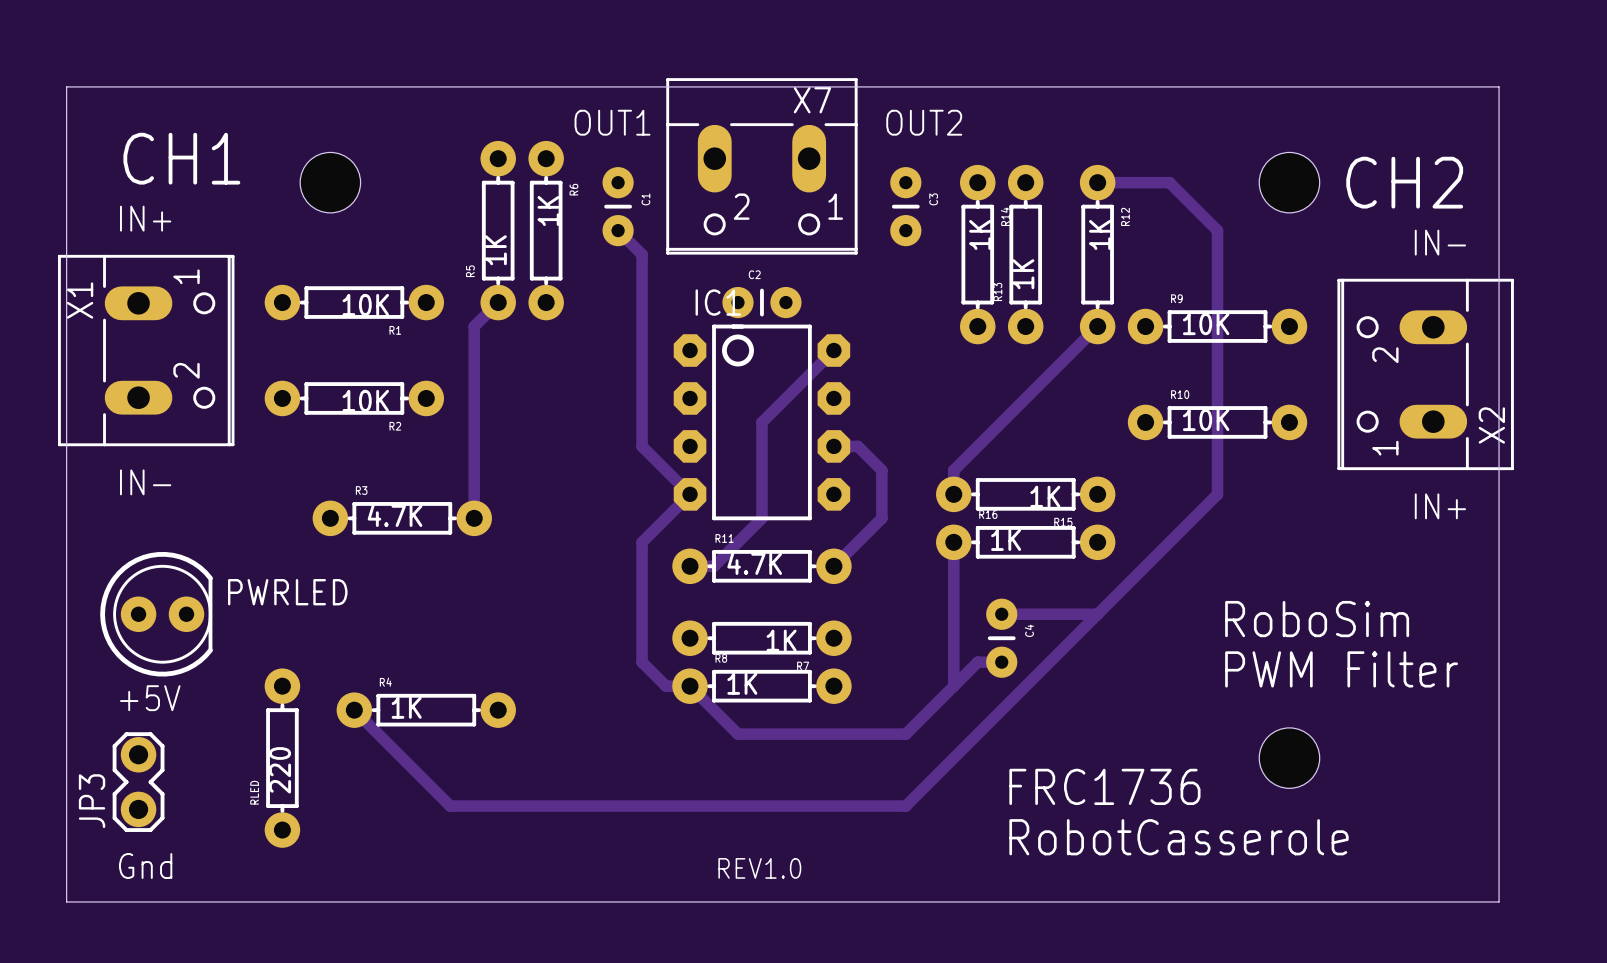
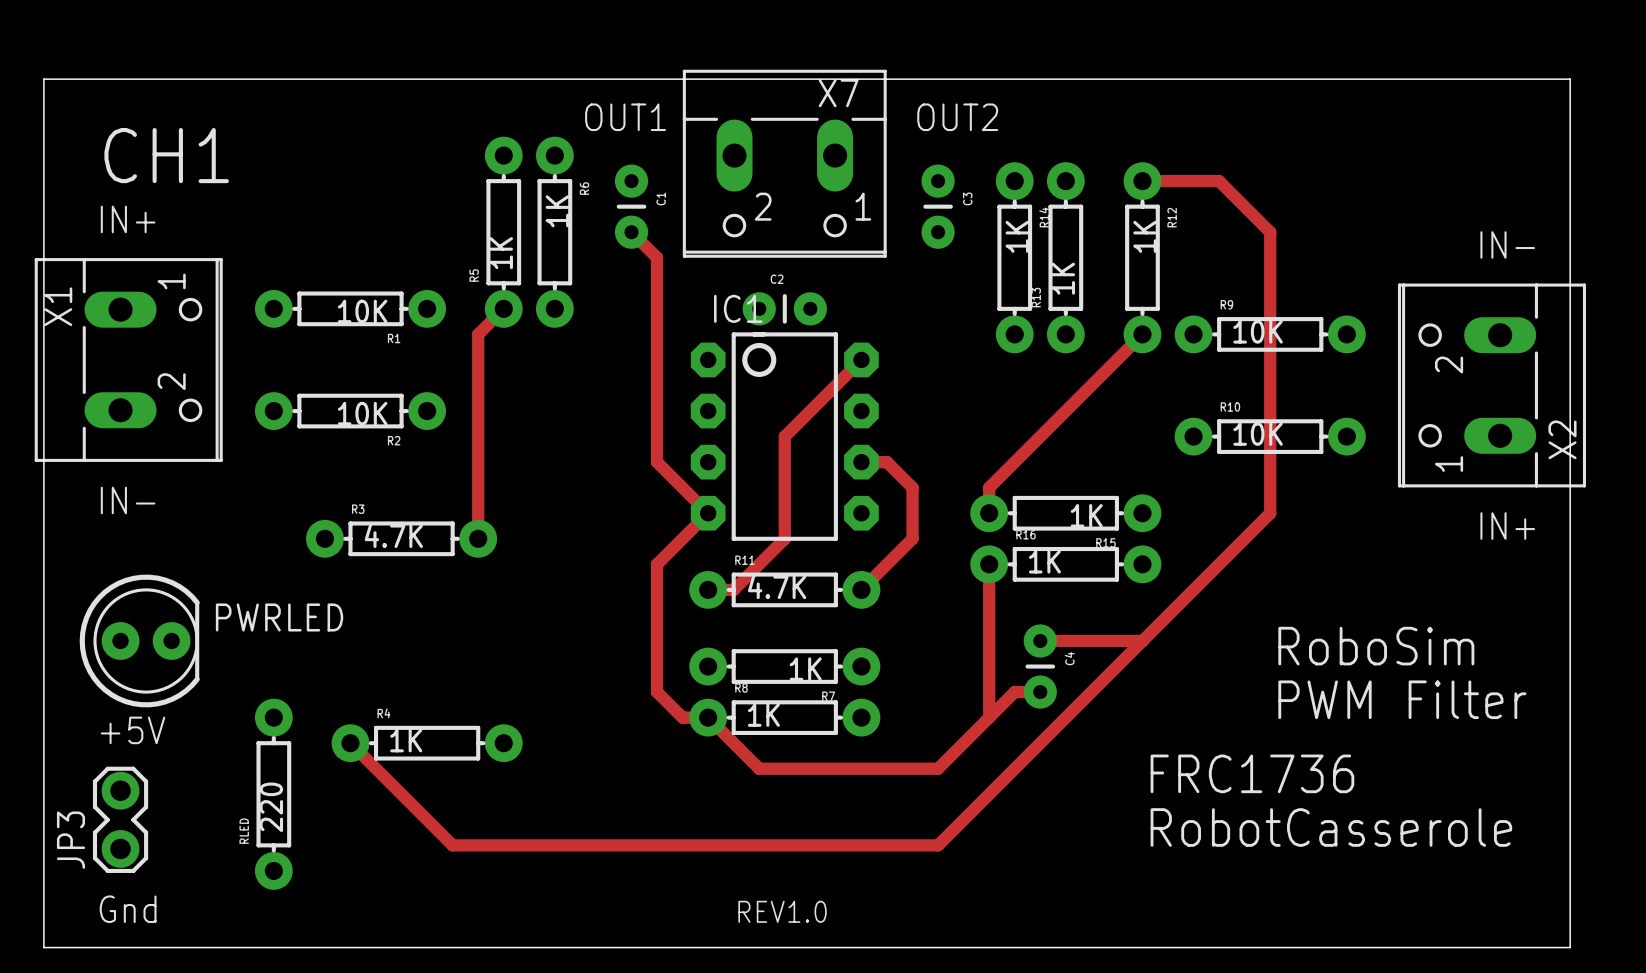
hole: (330, 182) -> none
hole: (1289, 182) -> none
text: CH2 (1404, 182) -> none
hole: (1289, 758) -> none
text position: FRC1736 (1104, 786) -> FRC1736 (1252, 773)
text position: RobotCasserole (1179, 837) -> RobotCasserole (1331, 827)

